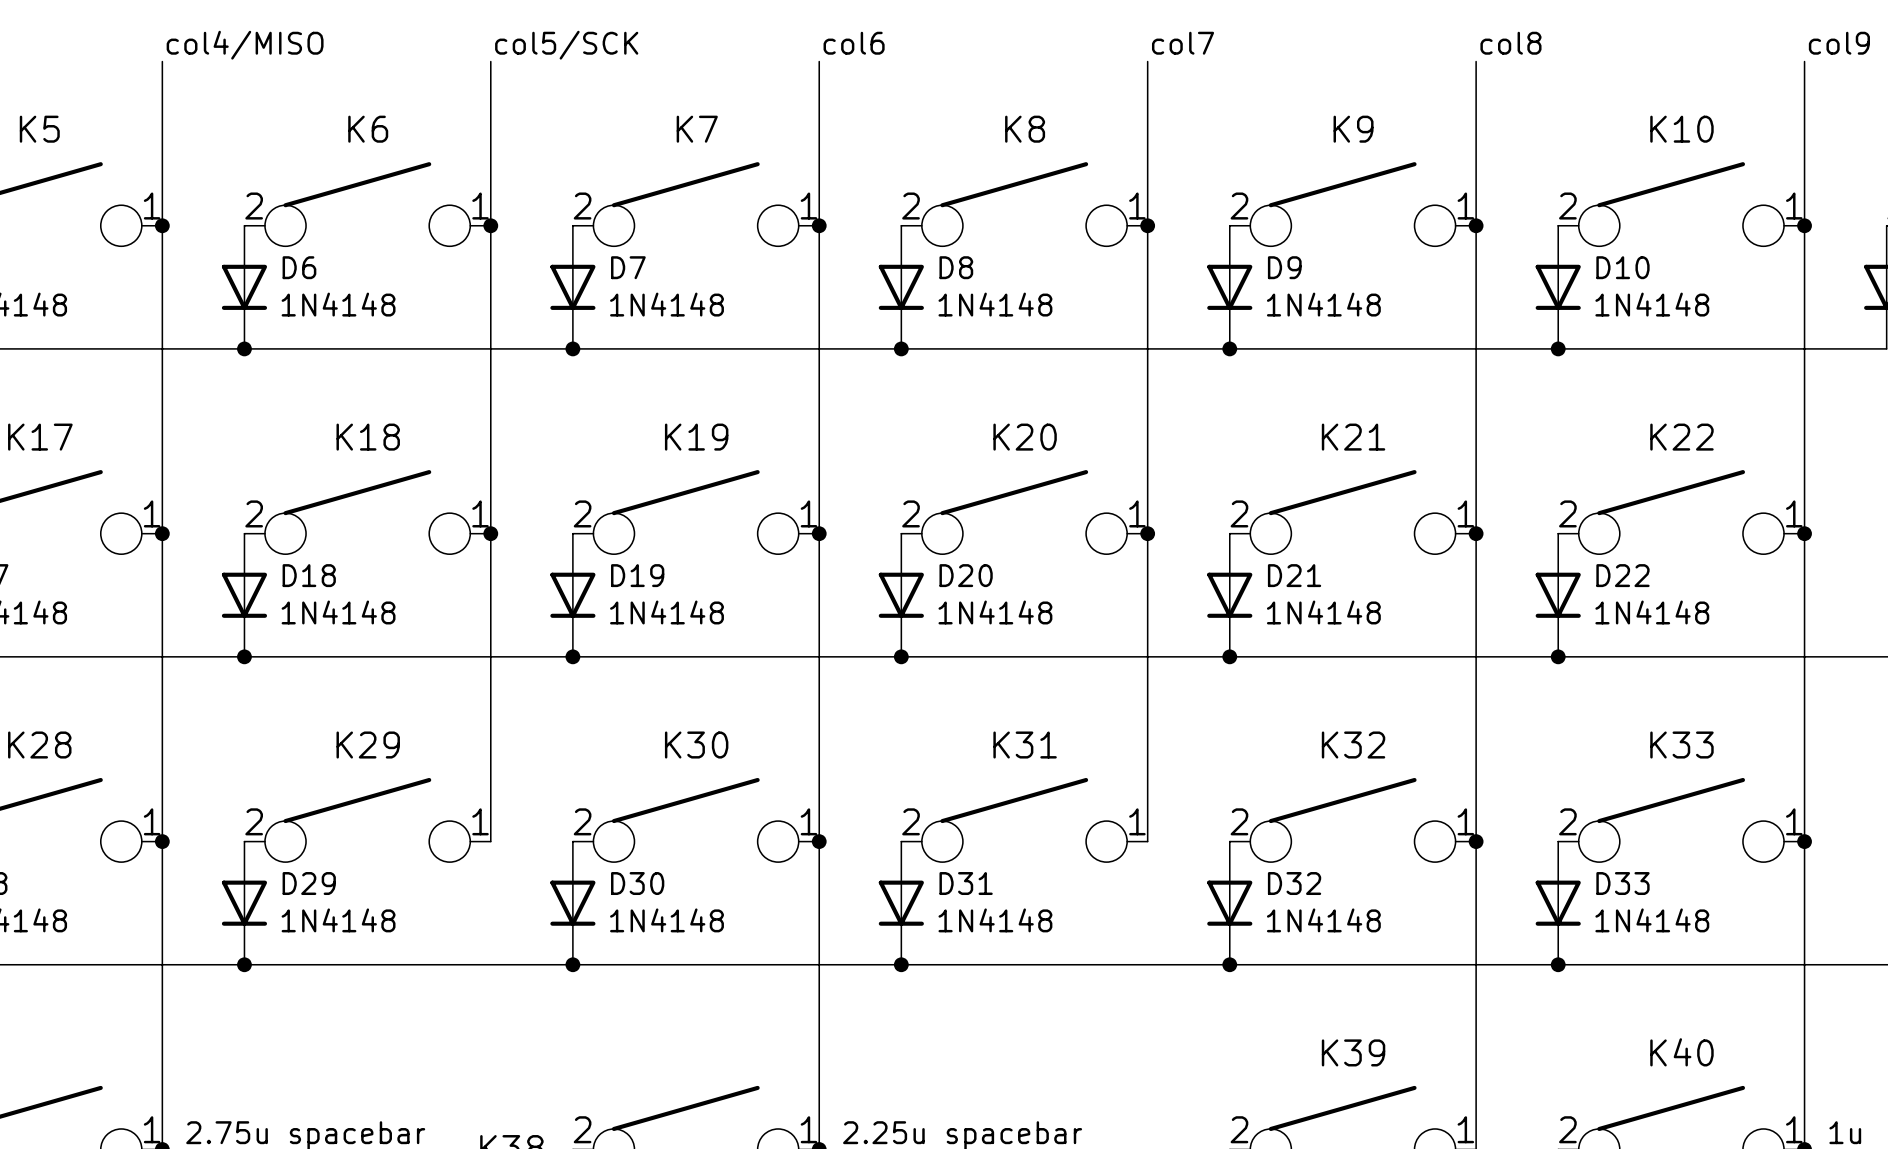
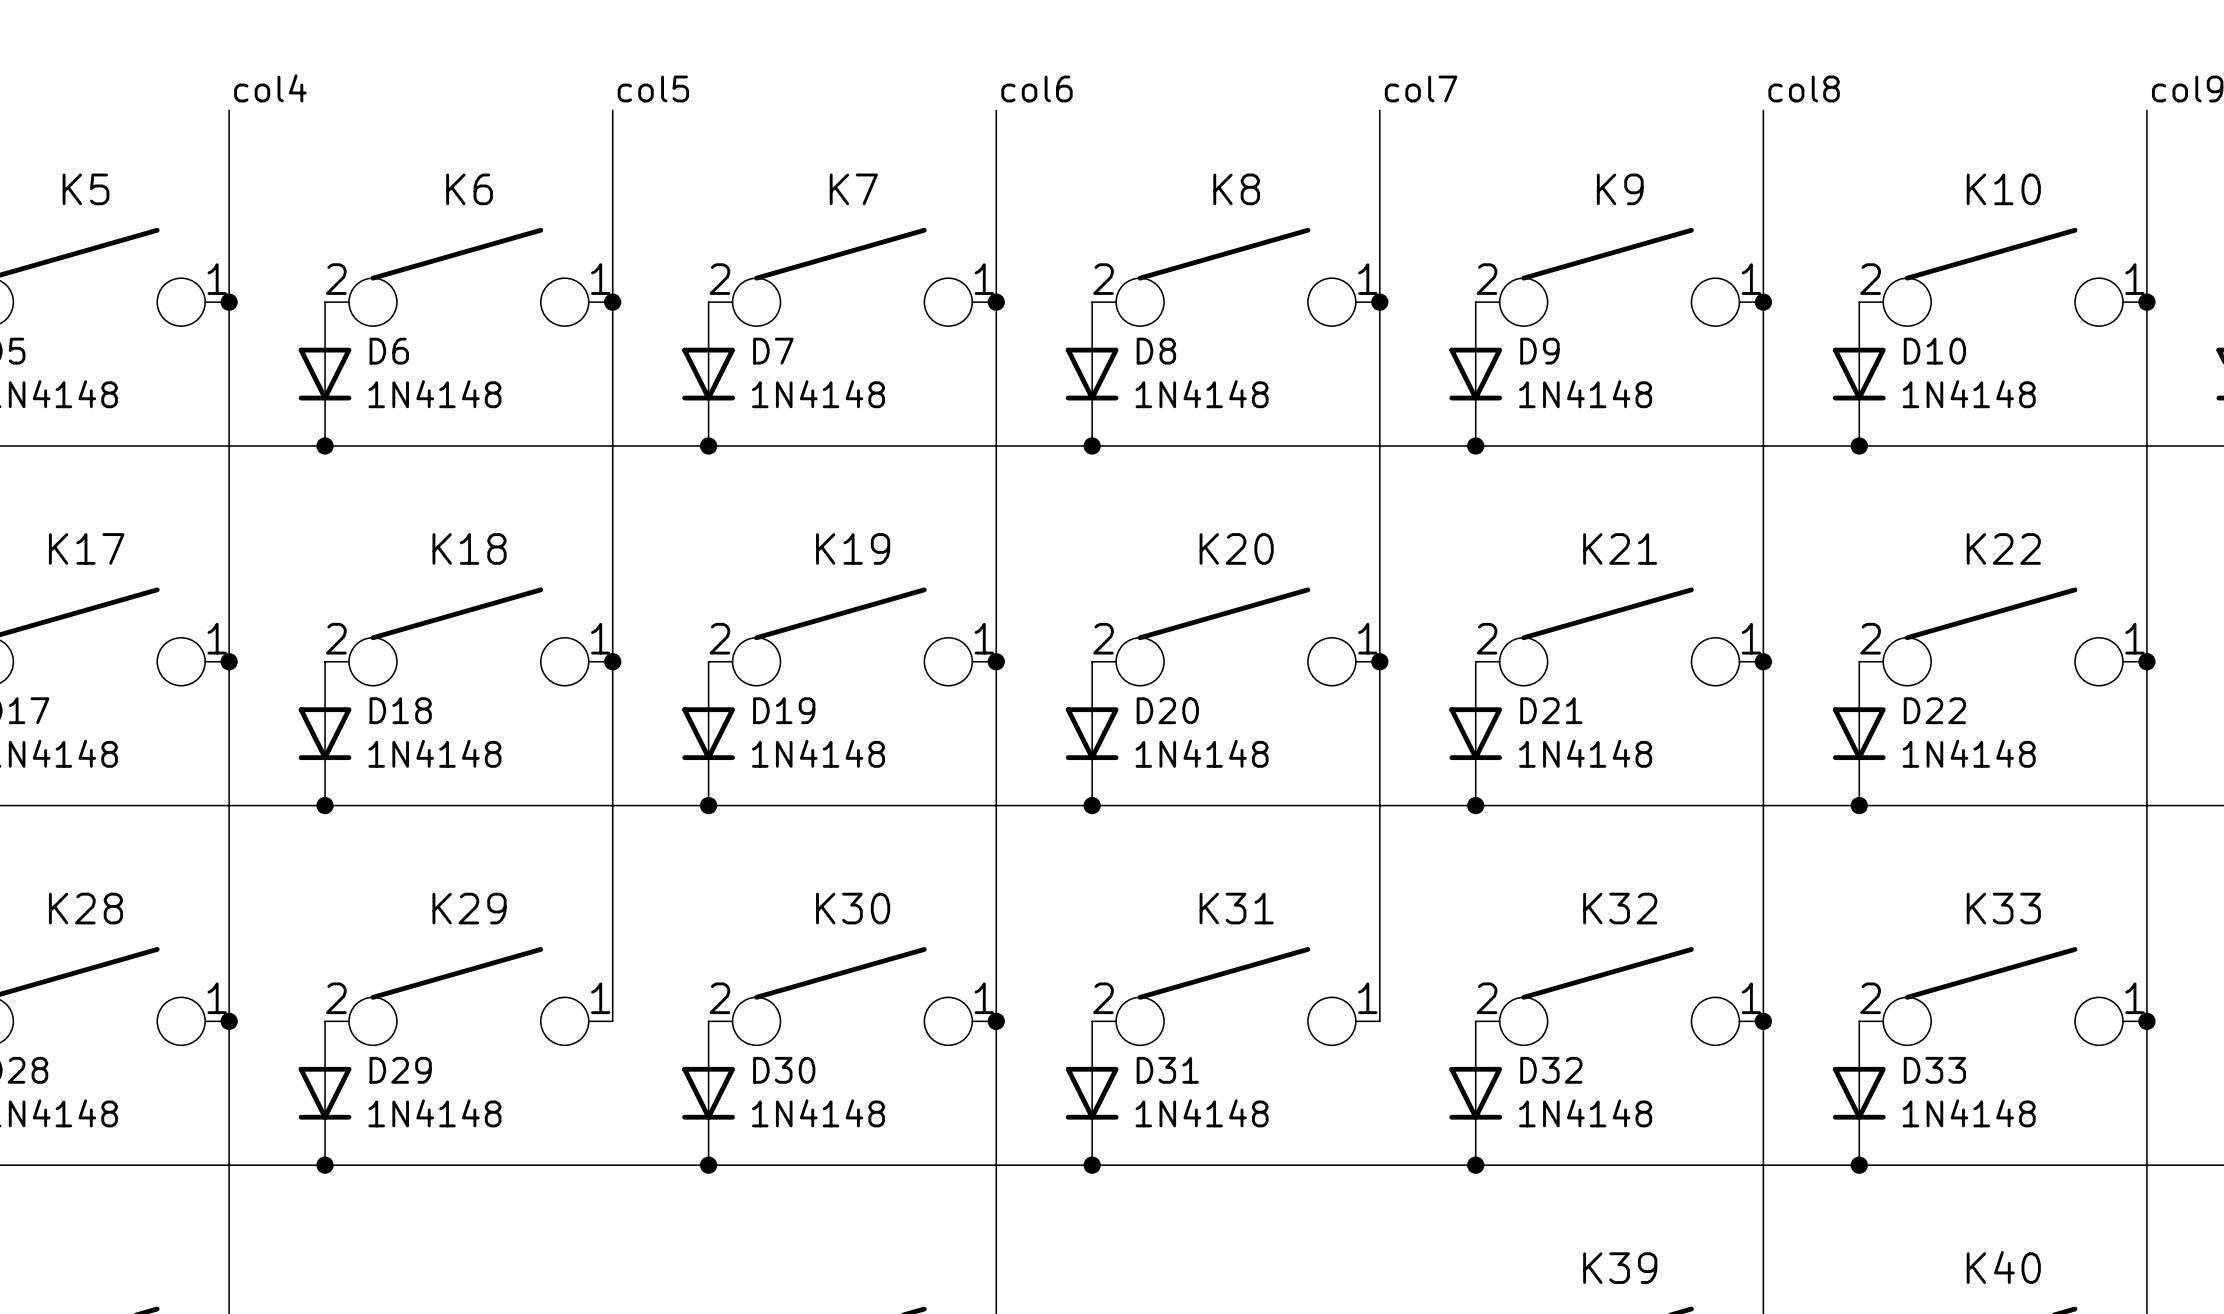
label: col4/MISO (245, 45) -> col4 (270, 88)
label: col5/SCK (566, 45) -> col5 (653, 88)

